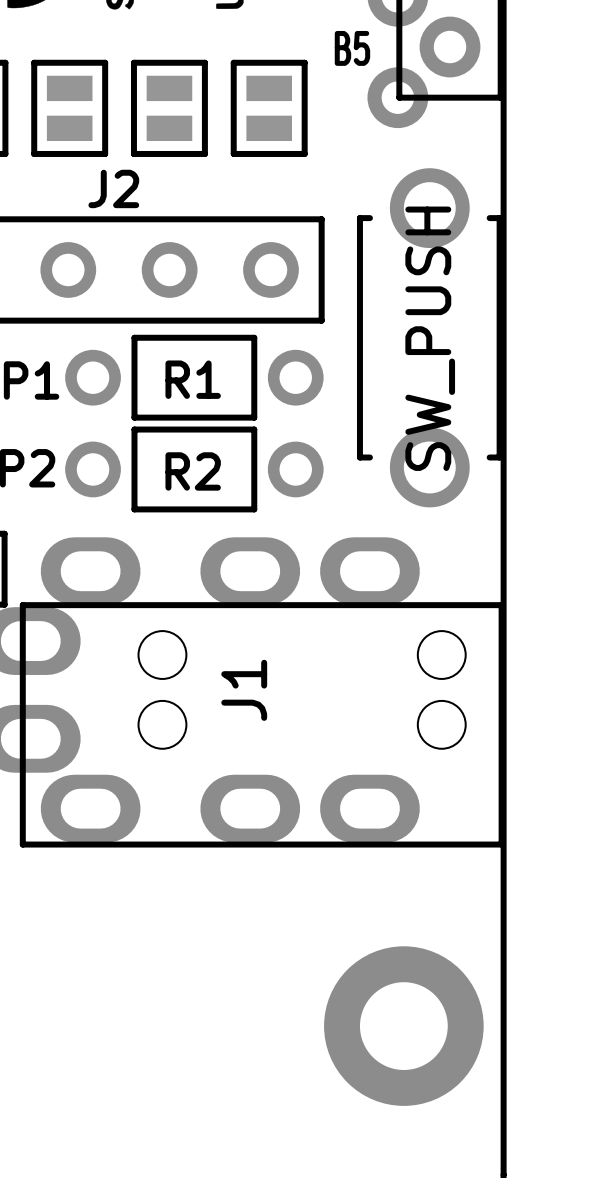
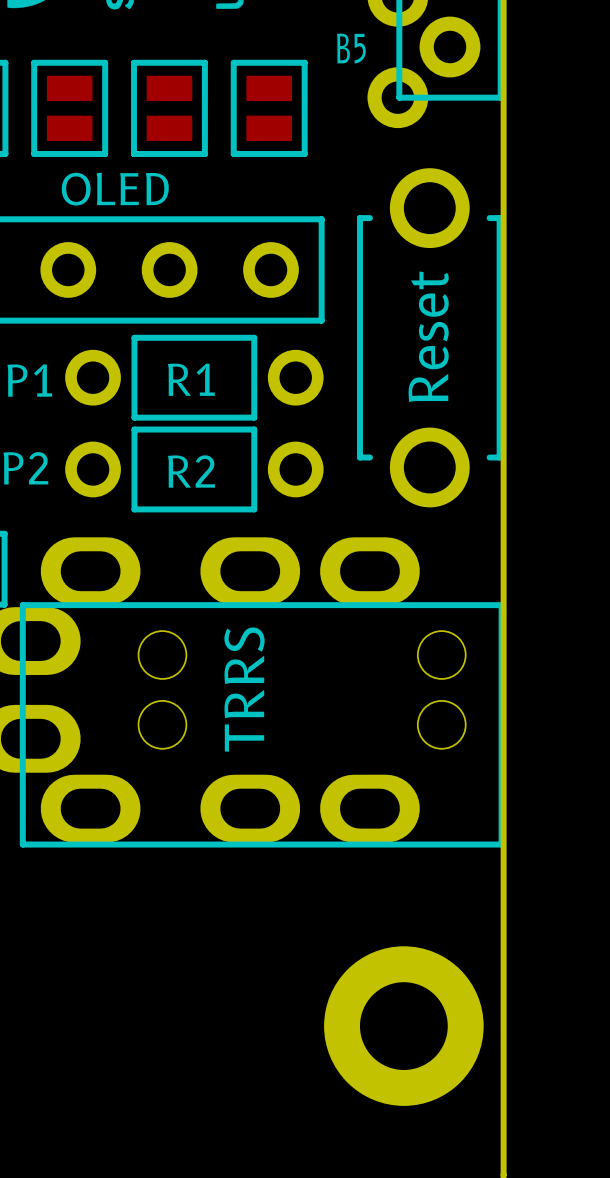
J2 name: J2 (113, 188) -> OLED (115, 189)
part value: SW_PUSH (430, 338) -> Reset (428, 336)
J1 name: J1 (244, 690) -> TRRS (244, 689)

